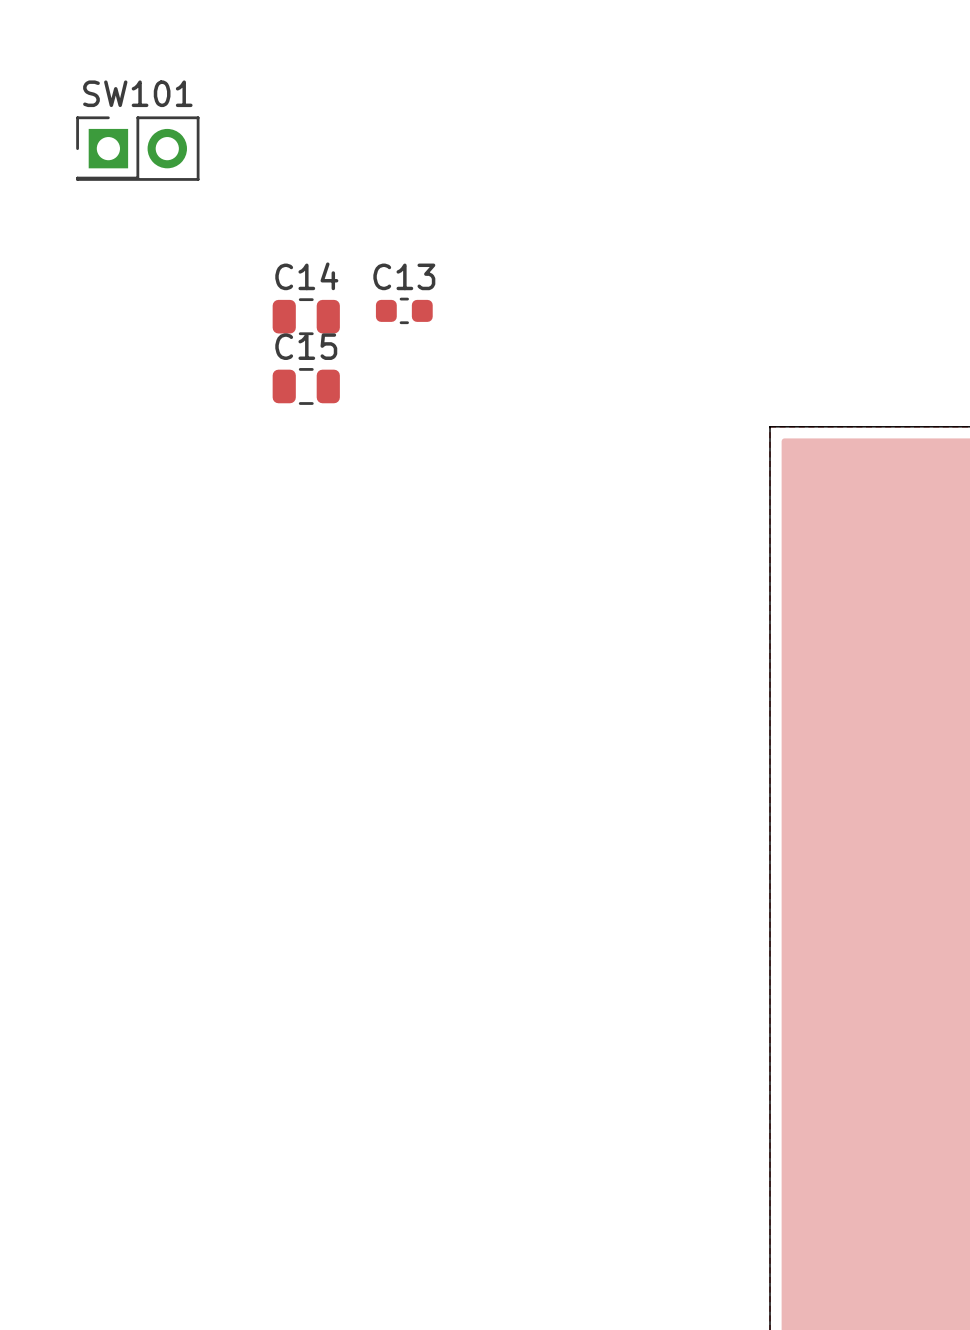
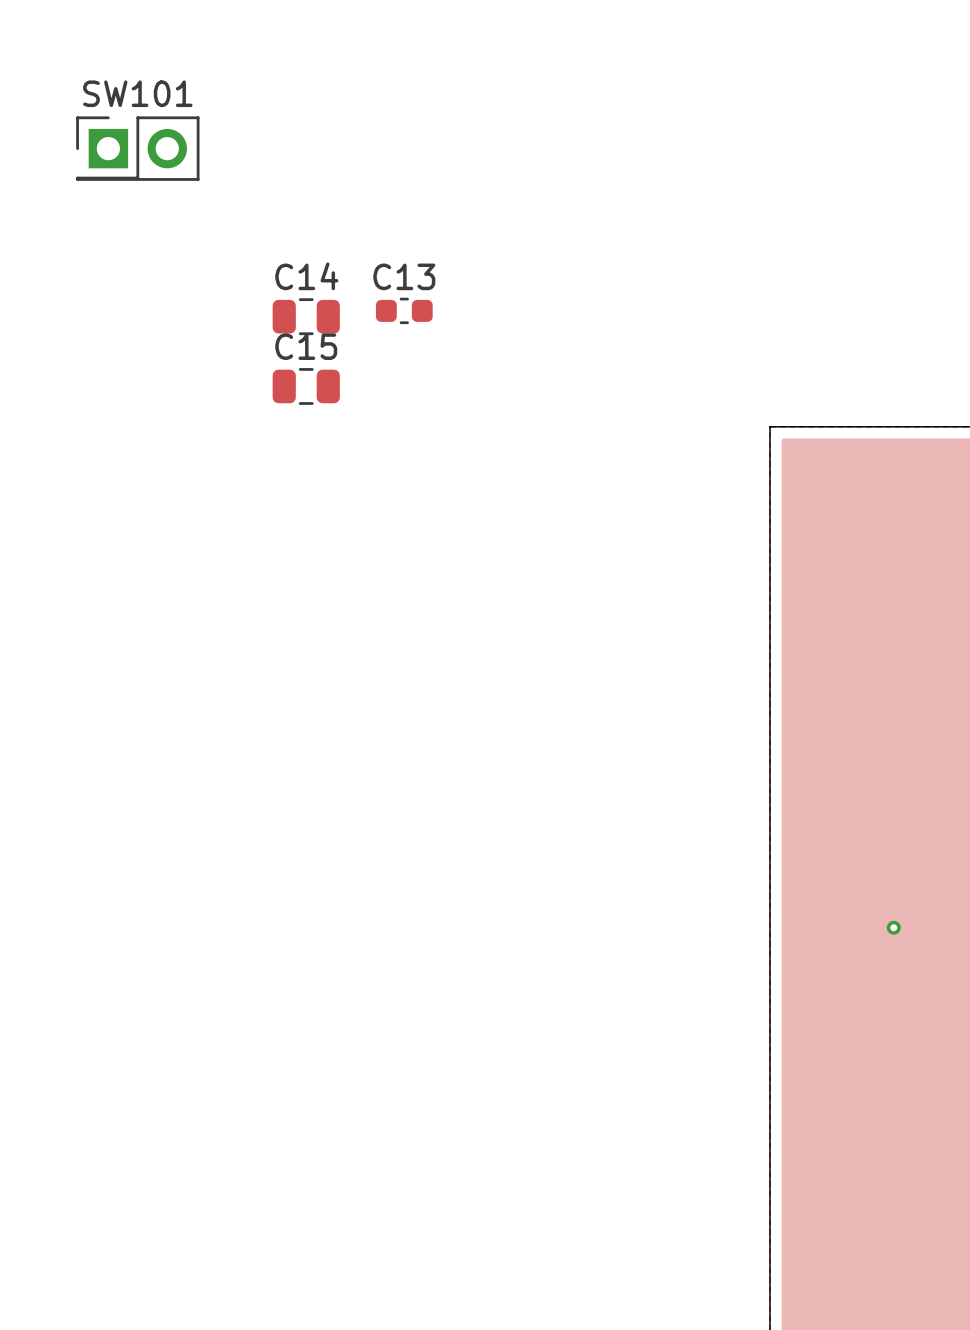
via: none -> (893, 927)

